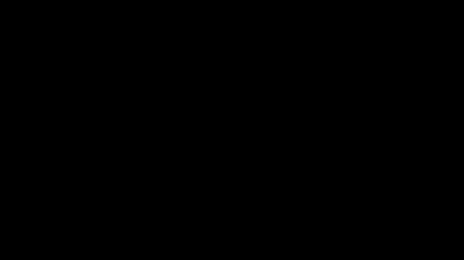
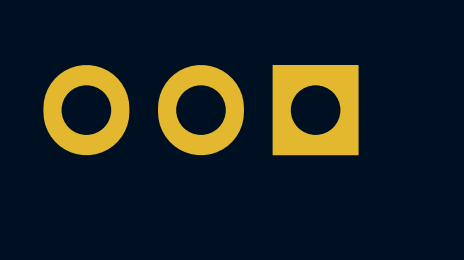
part: none -> (200, 110)

